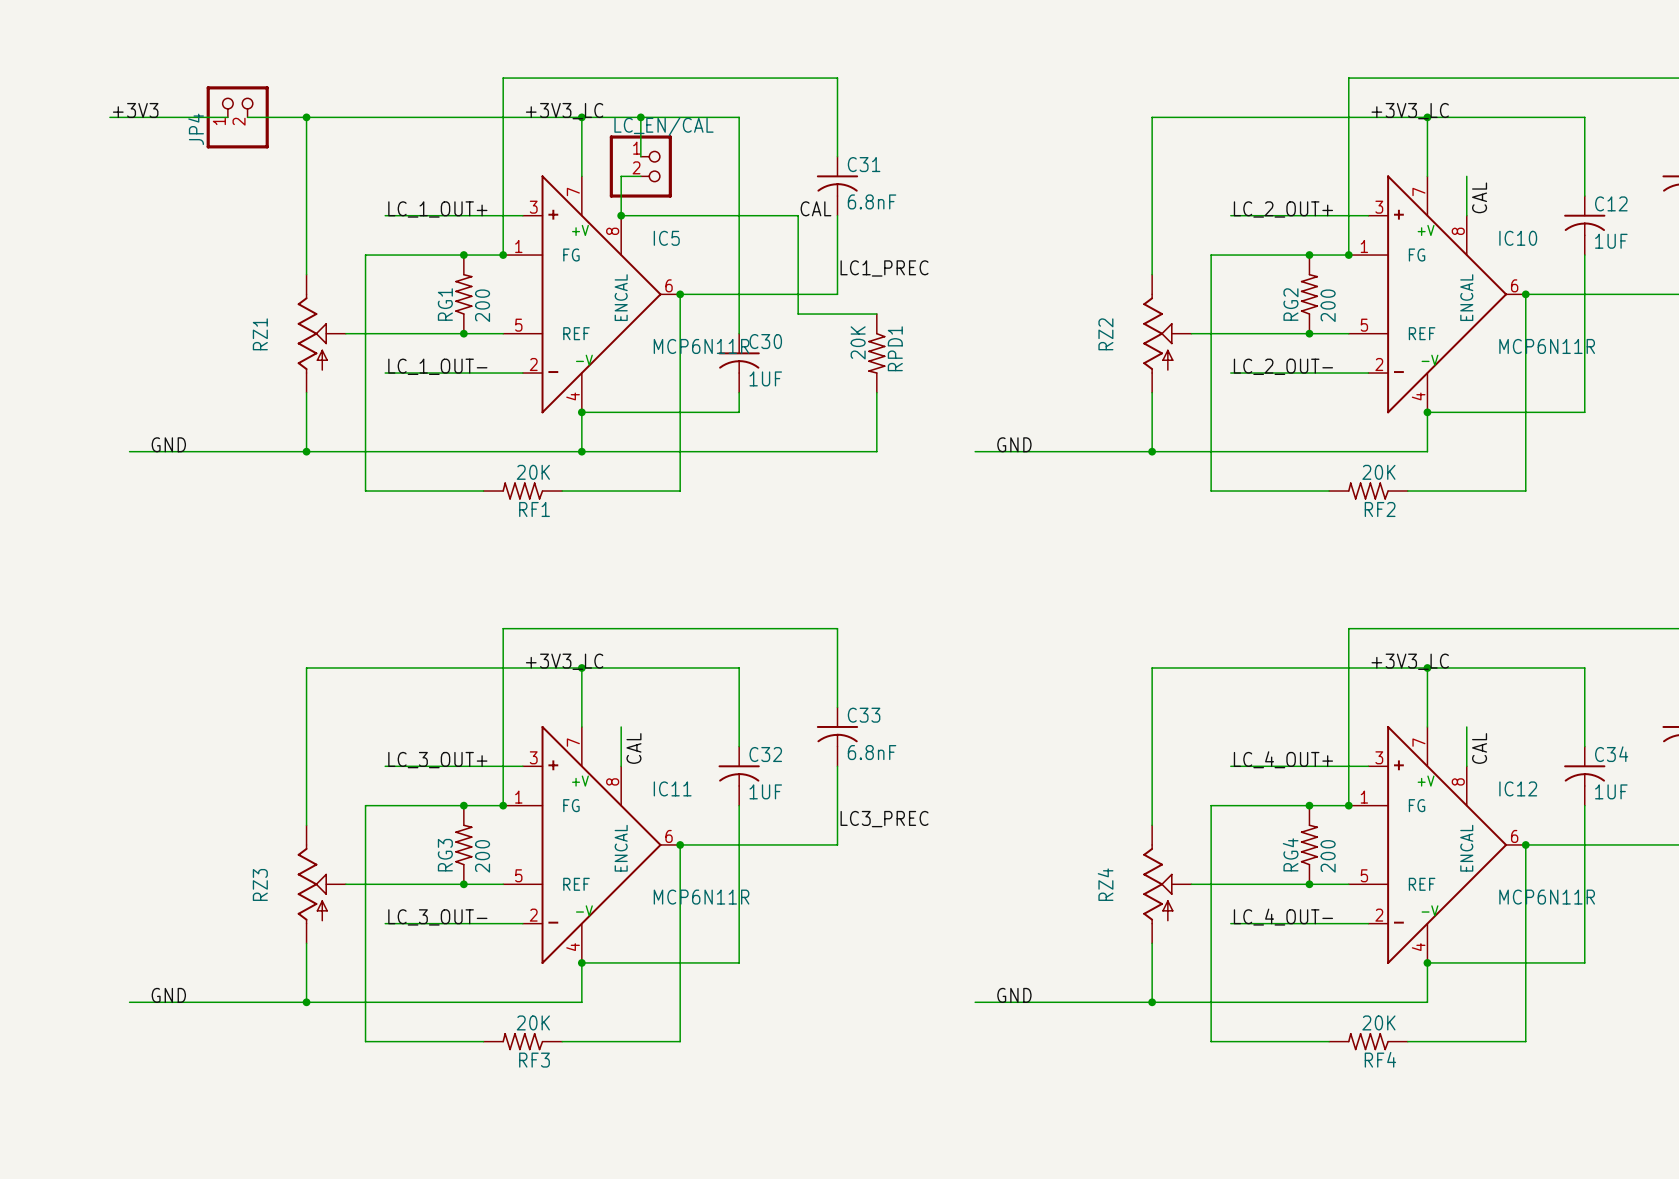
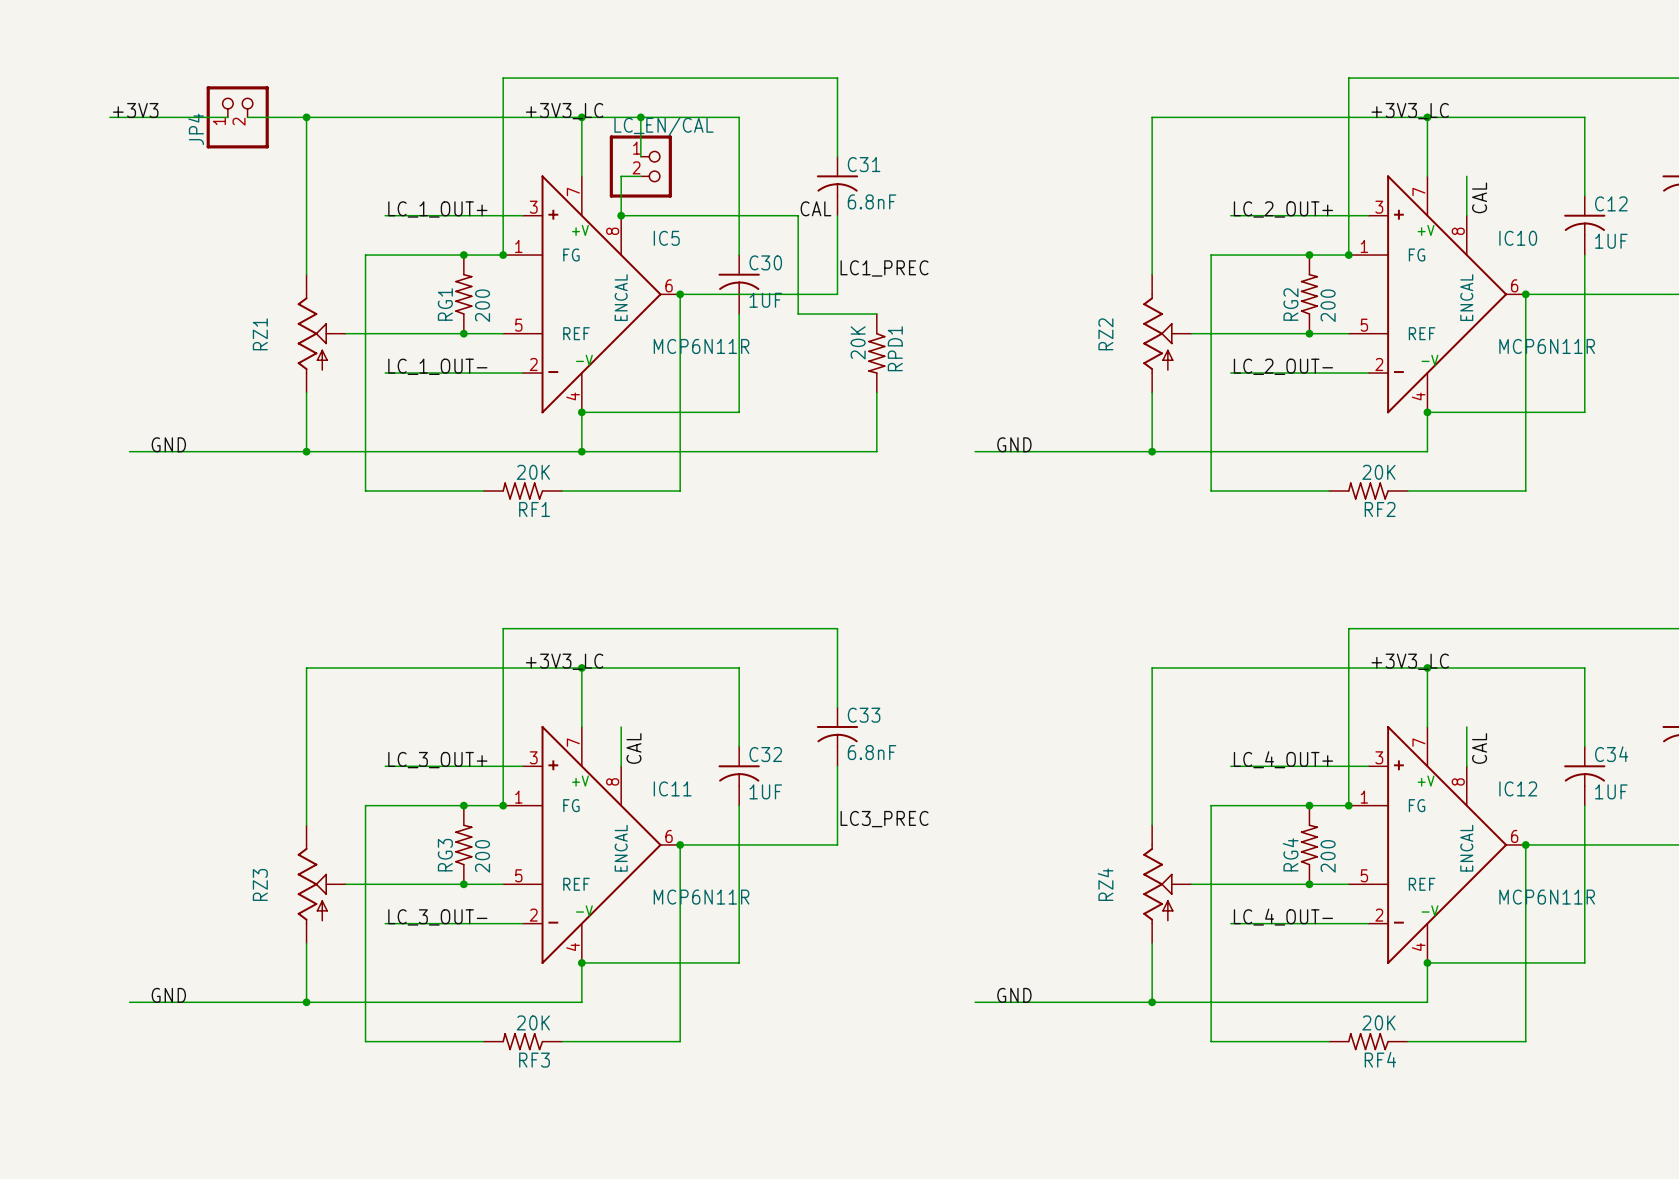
C30 position: (739, 363) -> (739, 284)

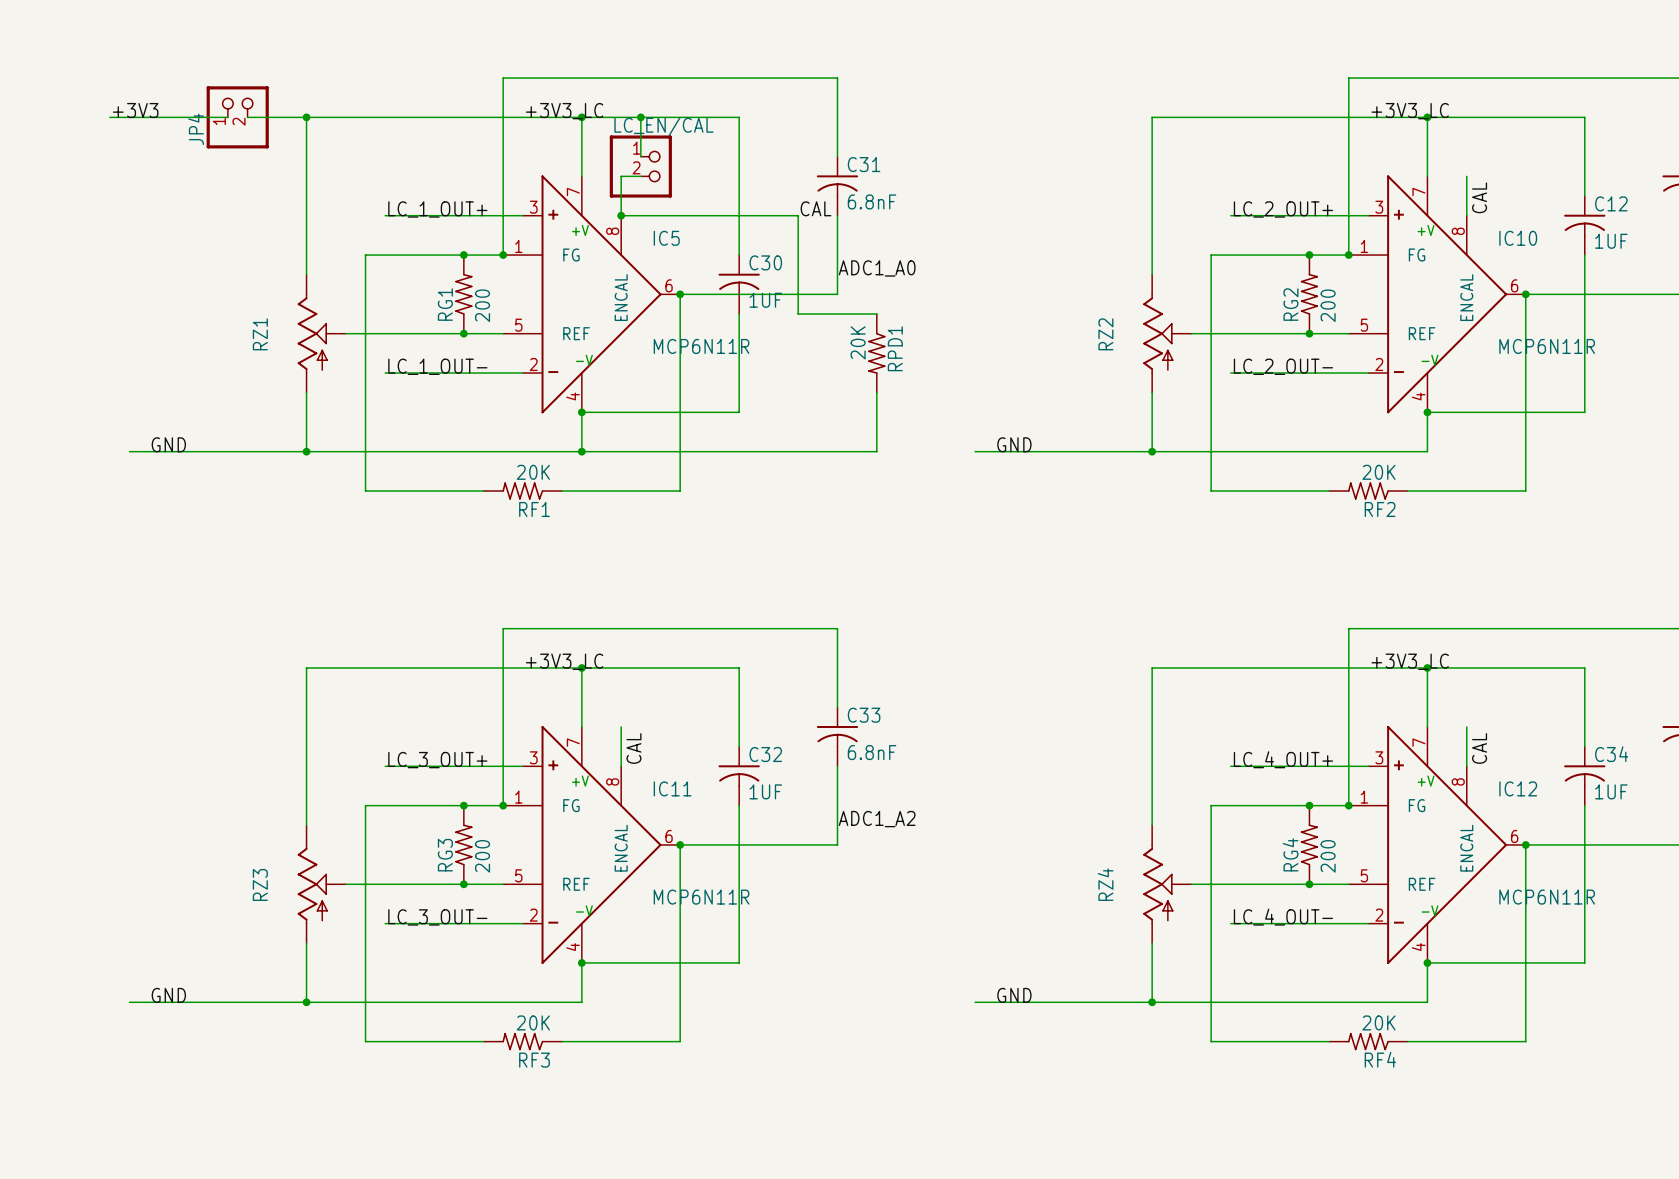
label: LC1_PREC (884, 268) -> ADC1_A0 (877, 268)
label: LC3_PREC (884, 819) -> ADC1_A2 (877, 819)

